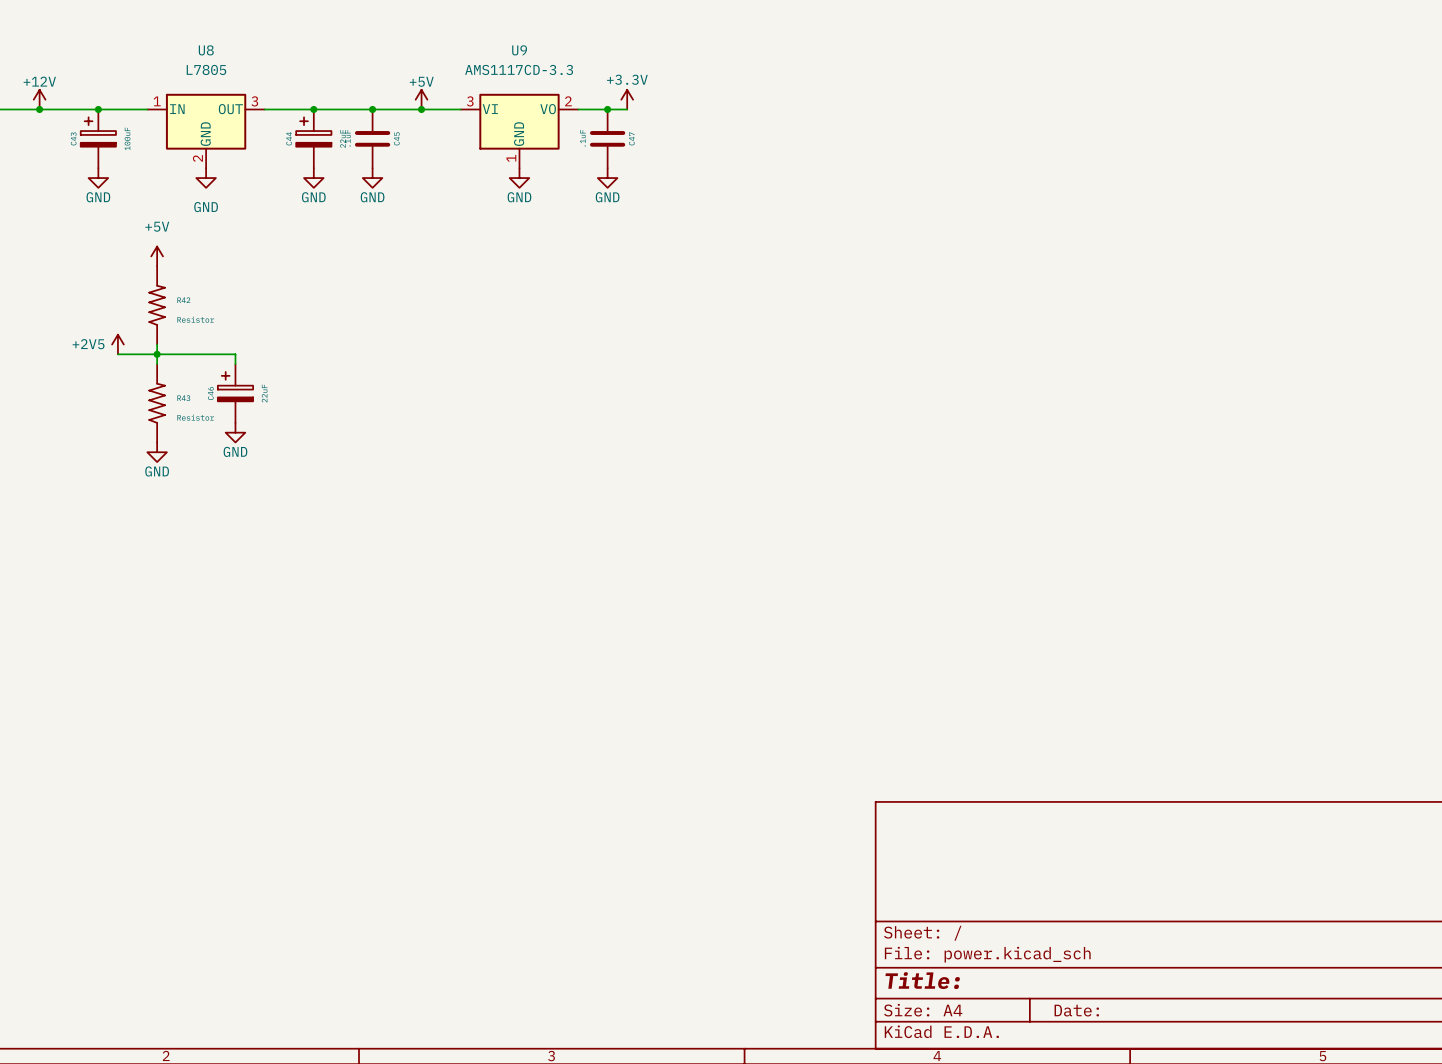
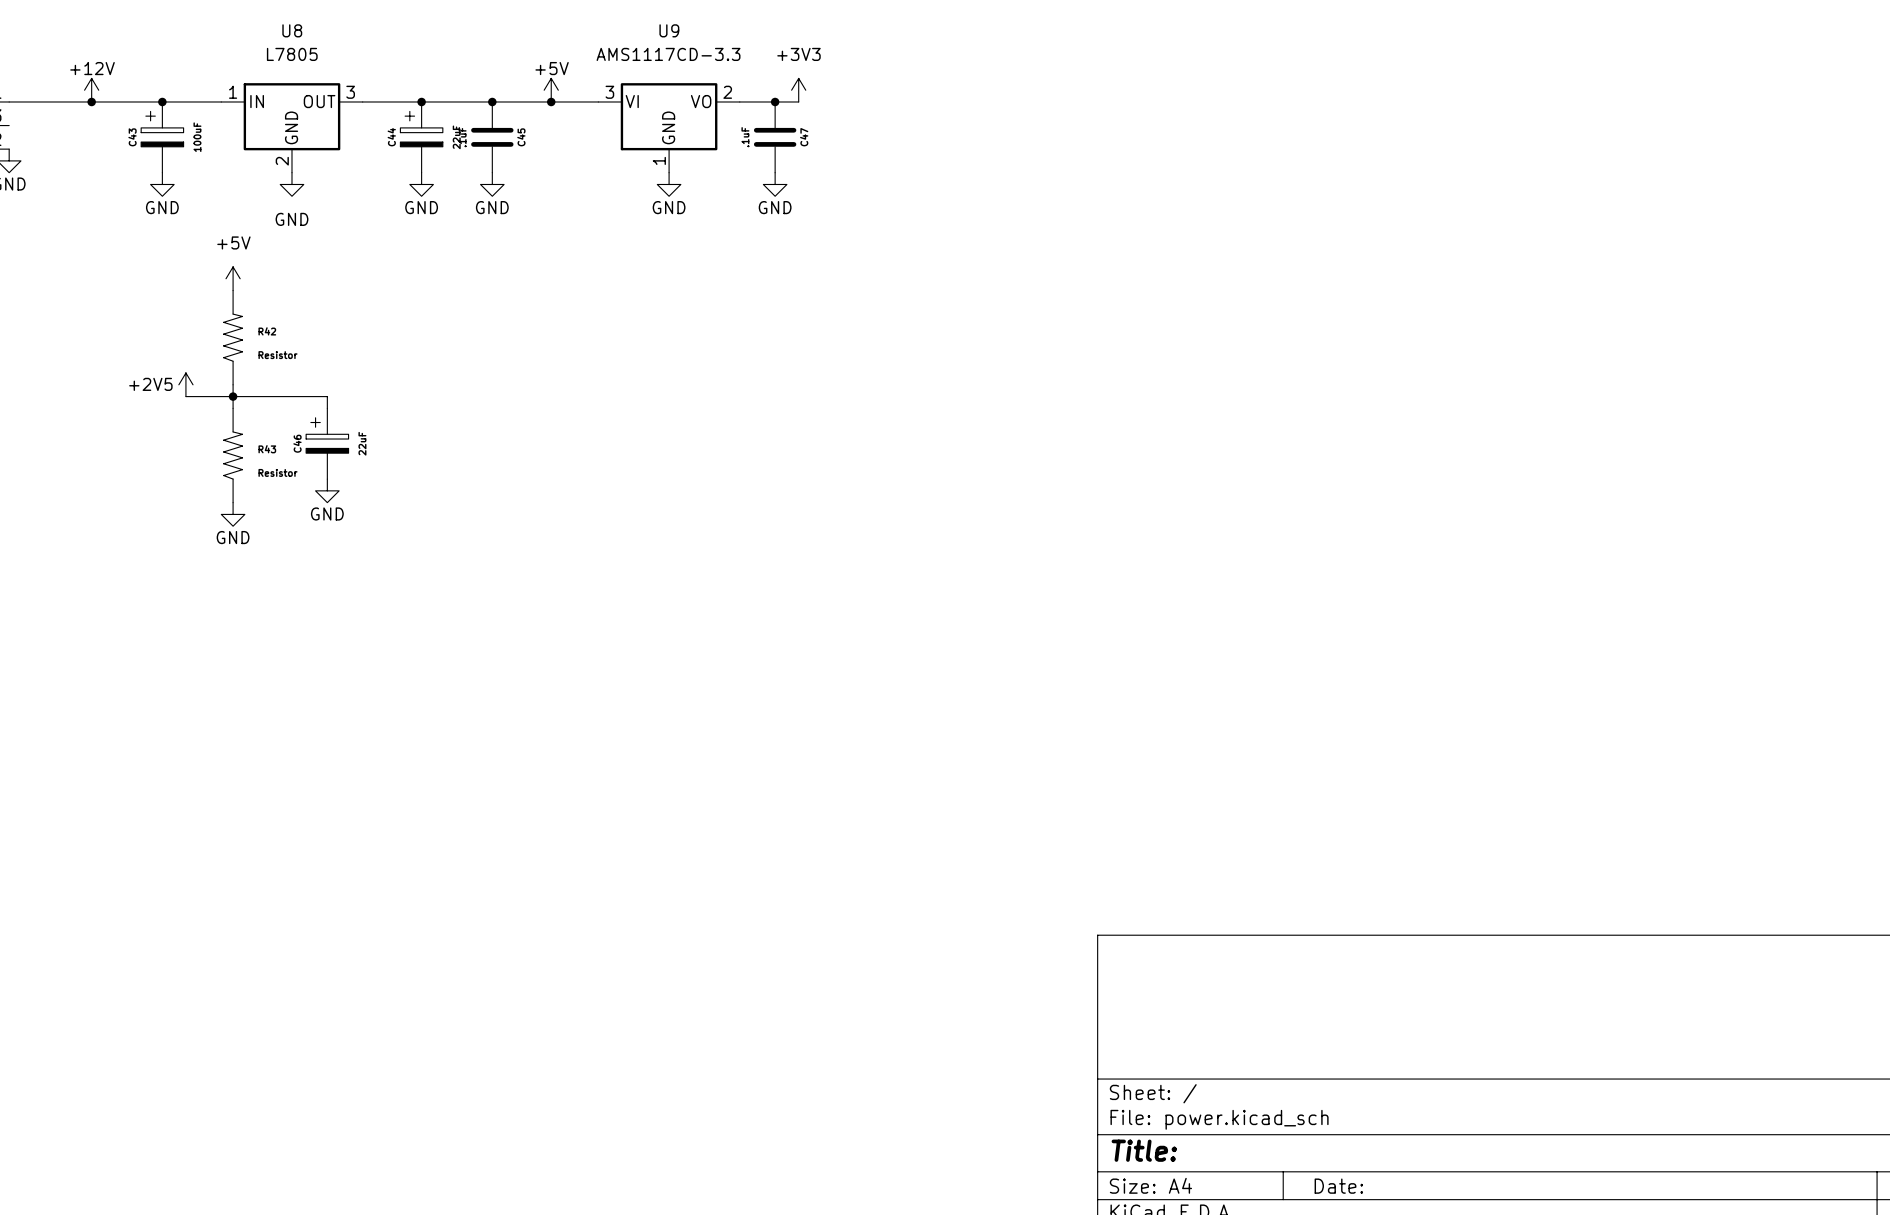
power symbol: +3.3V (627, 99) -> +3V3 (798, 90)

